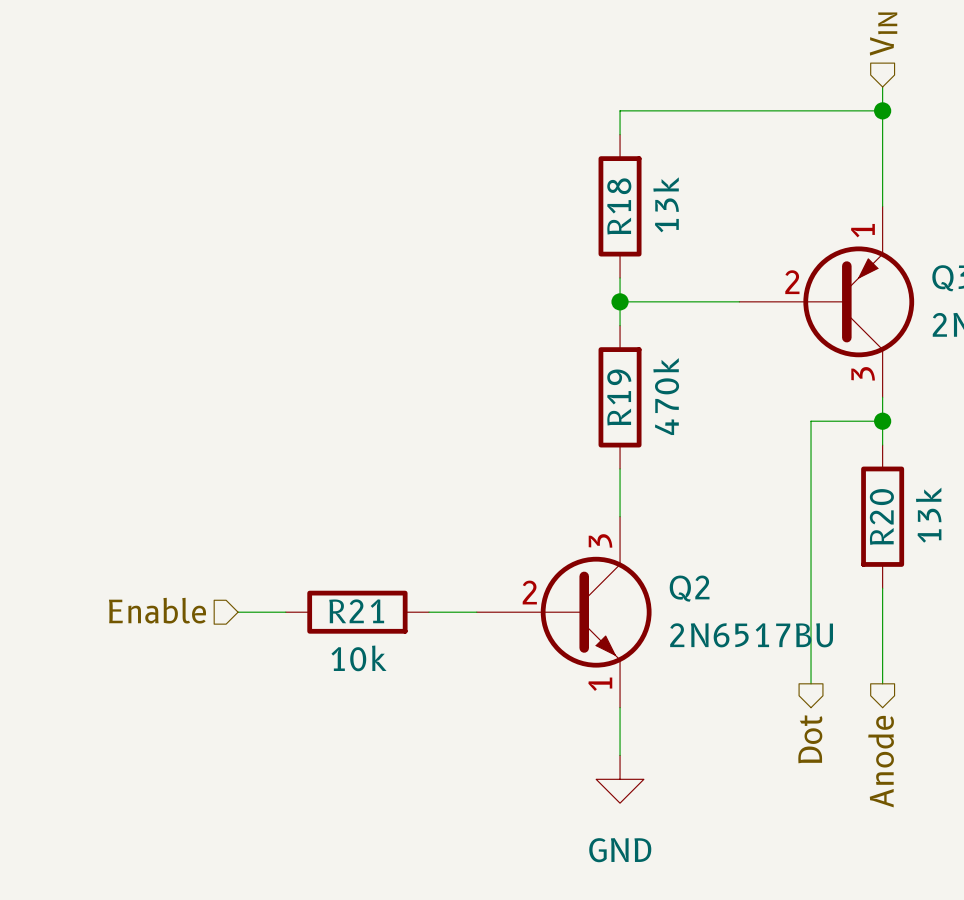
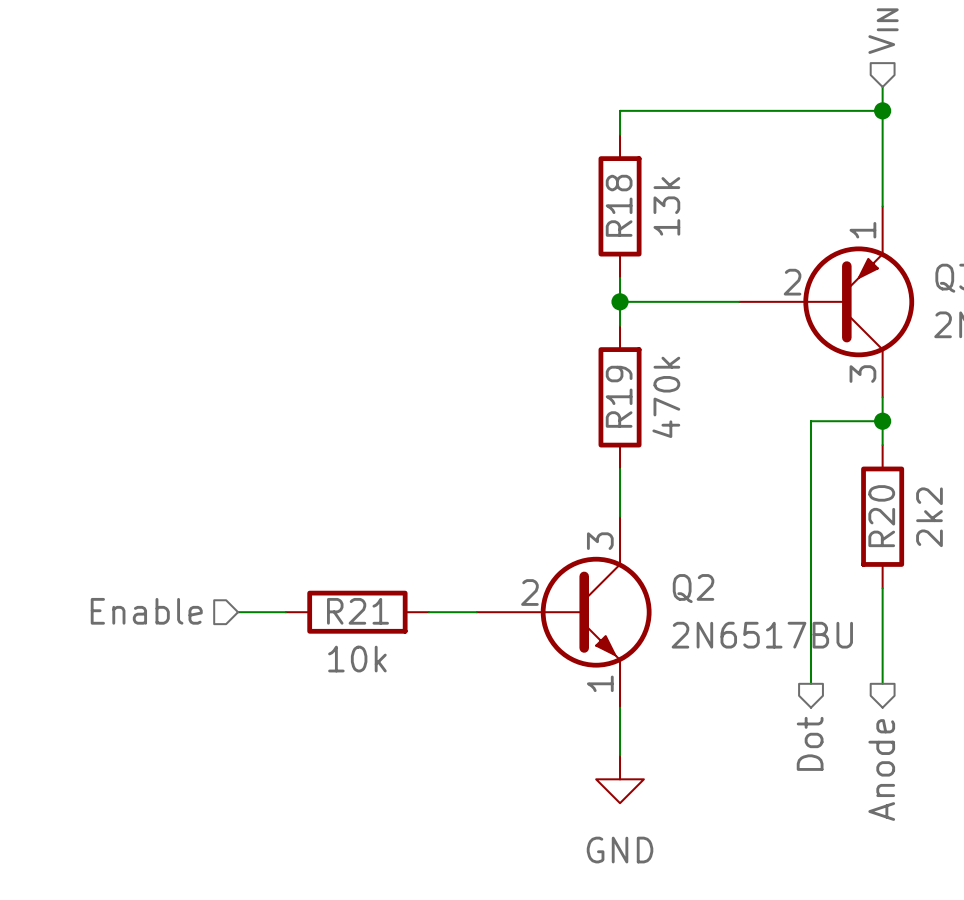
R20 value: 13k (928, 515) -> 2k2 (929, 517)

